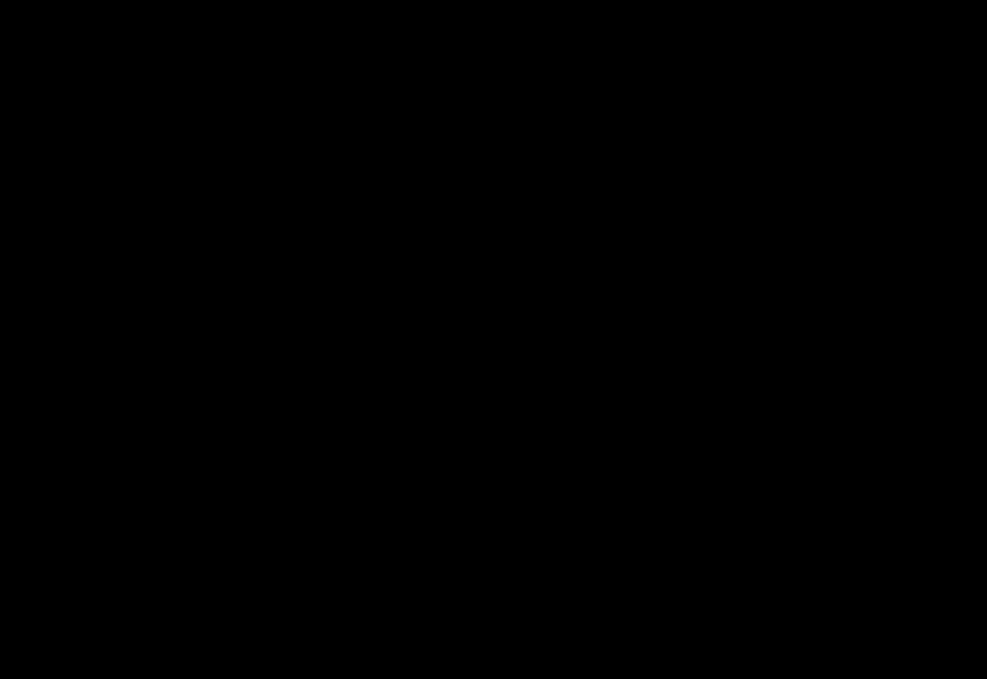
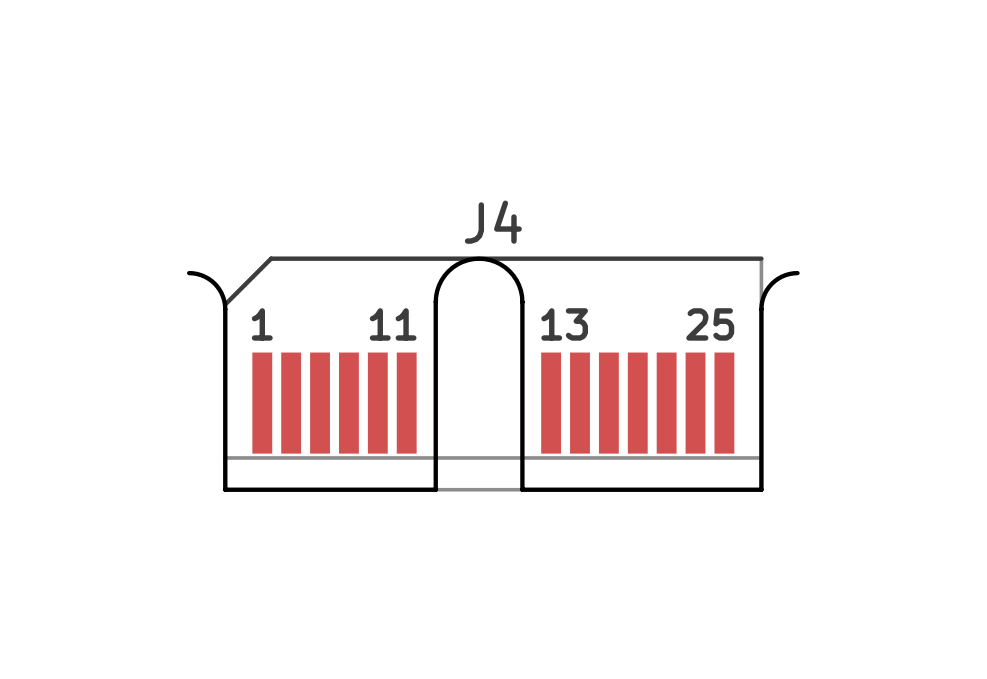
J4: none -> (493, 374)

